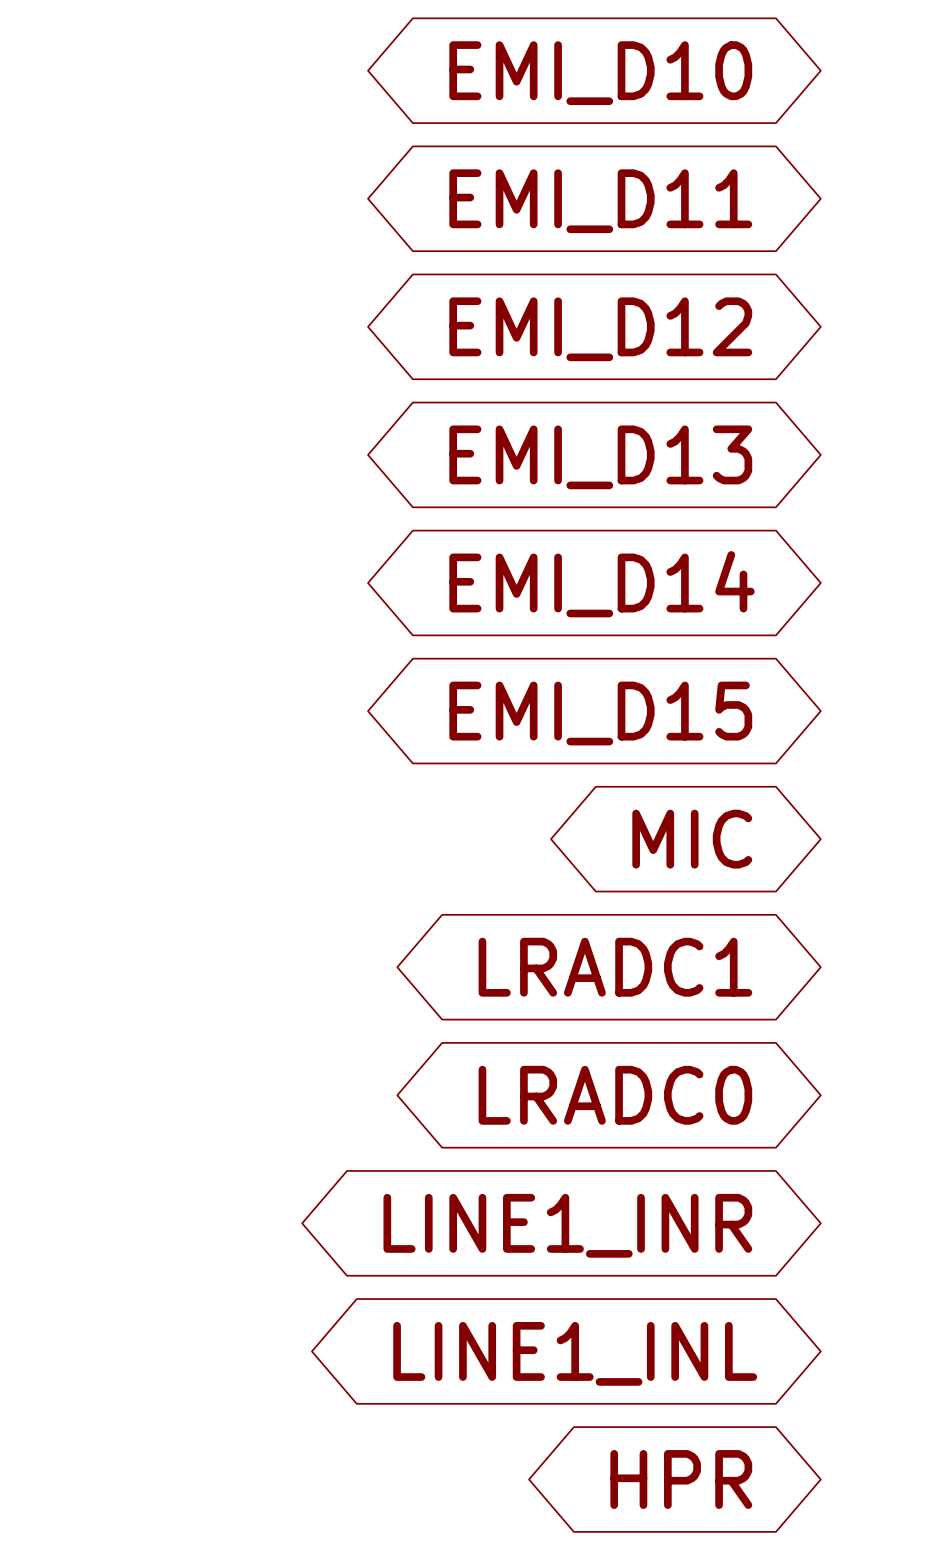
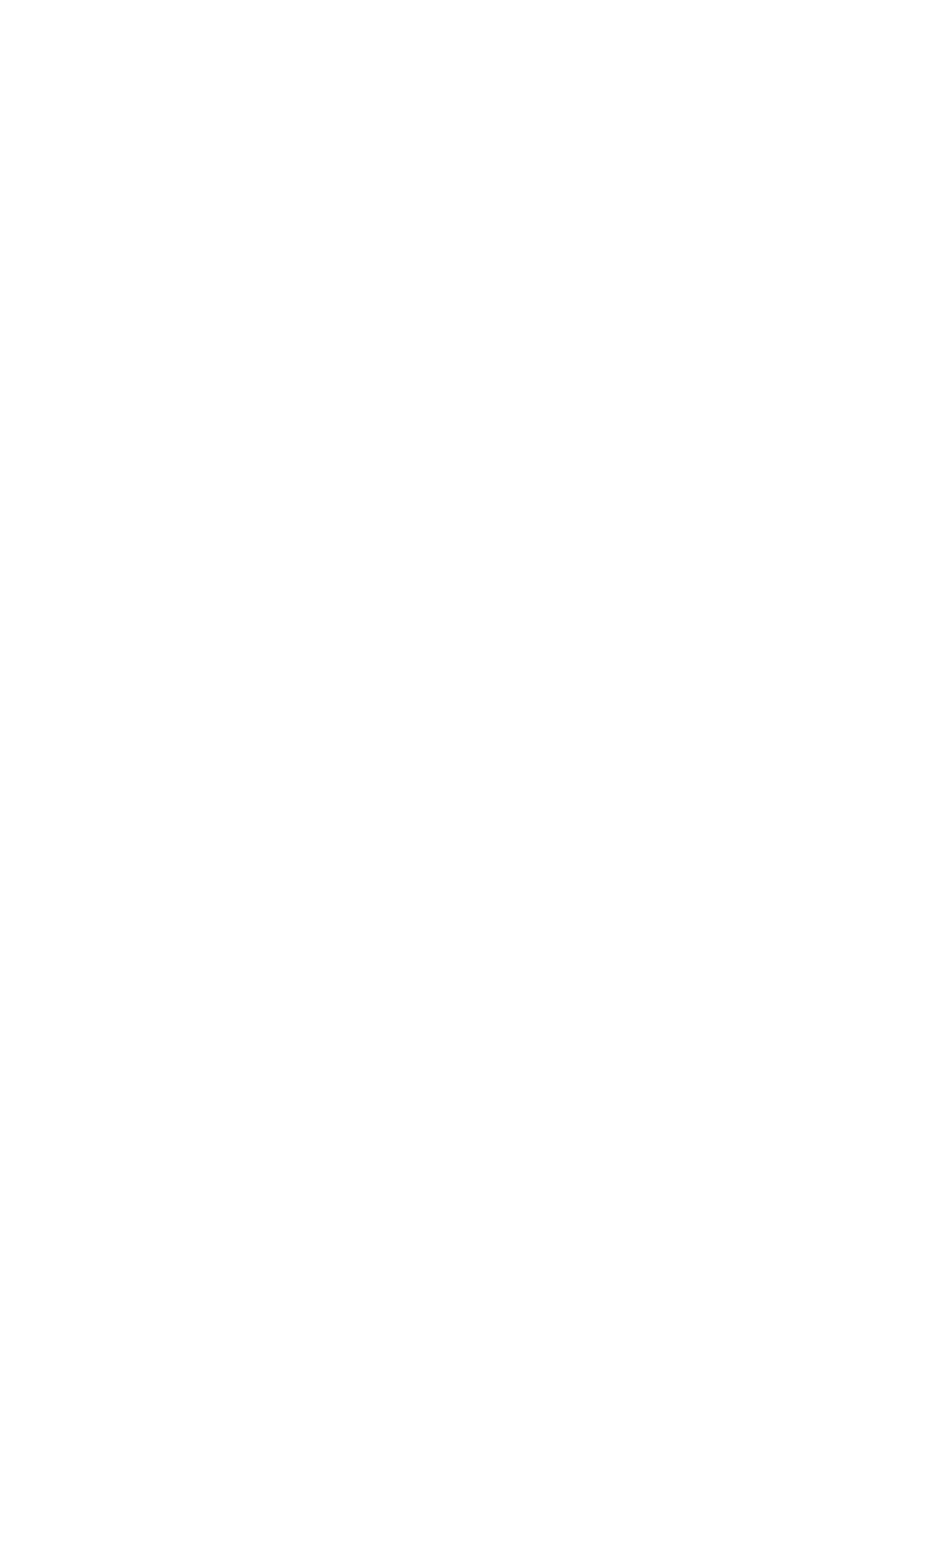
global label: EMI_D10 (600, 73) -> none
global label: EMI_D11 (600, 201) -> none
global label: EMI_D12 (600, 329) -> none
global label: EMI_D13 (600, 457) -> none
global label: EMI_D14 (601, 584) -> none
global label: EMI_D15 (600, 713) -> none
global label: MIC (692, 839) -> none
global label: LRADC1 (615, 967) -> none
global label: LRADC0 (615, 1095) -> none
global label: LINE1_INR (567, 1225) -> none
global label: LINE1_INL (575, 1353) -> none
global label: HPR (681, 1479) -> none

